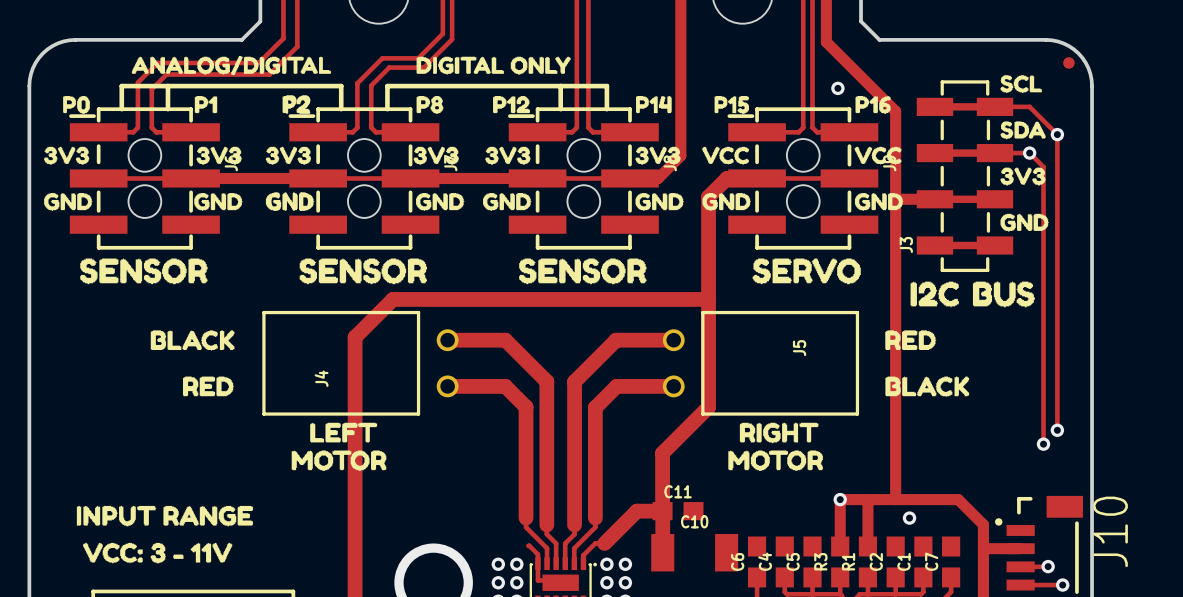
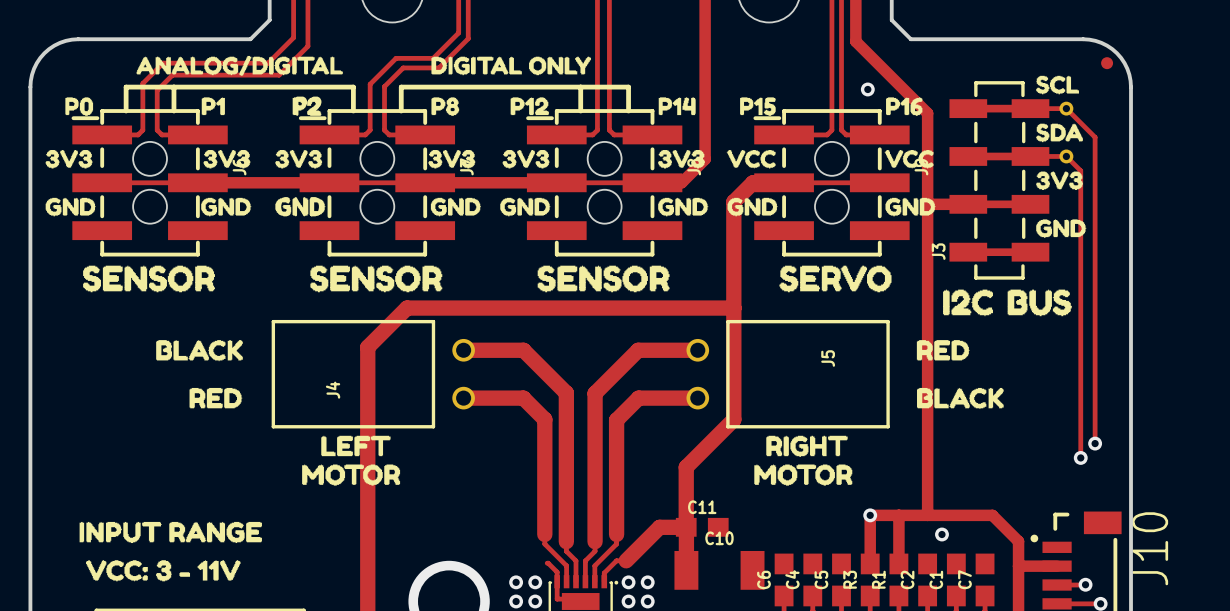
part: none -> (1066, 108)
via: (1057, 134) -> none
via: (1029, 153) -> none
part: none -> (1066, 156)

